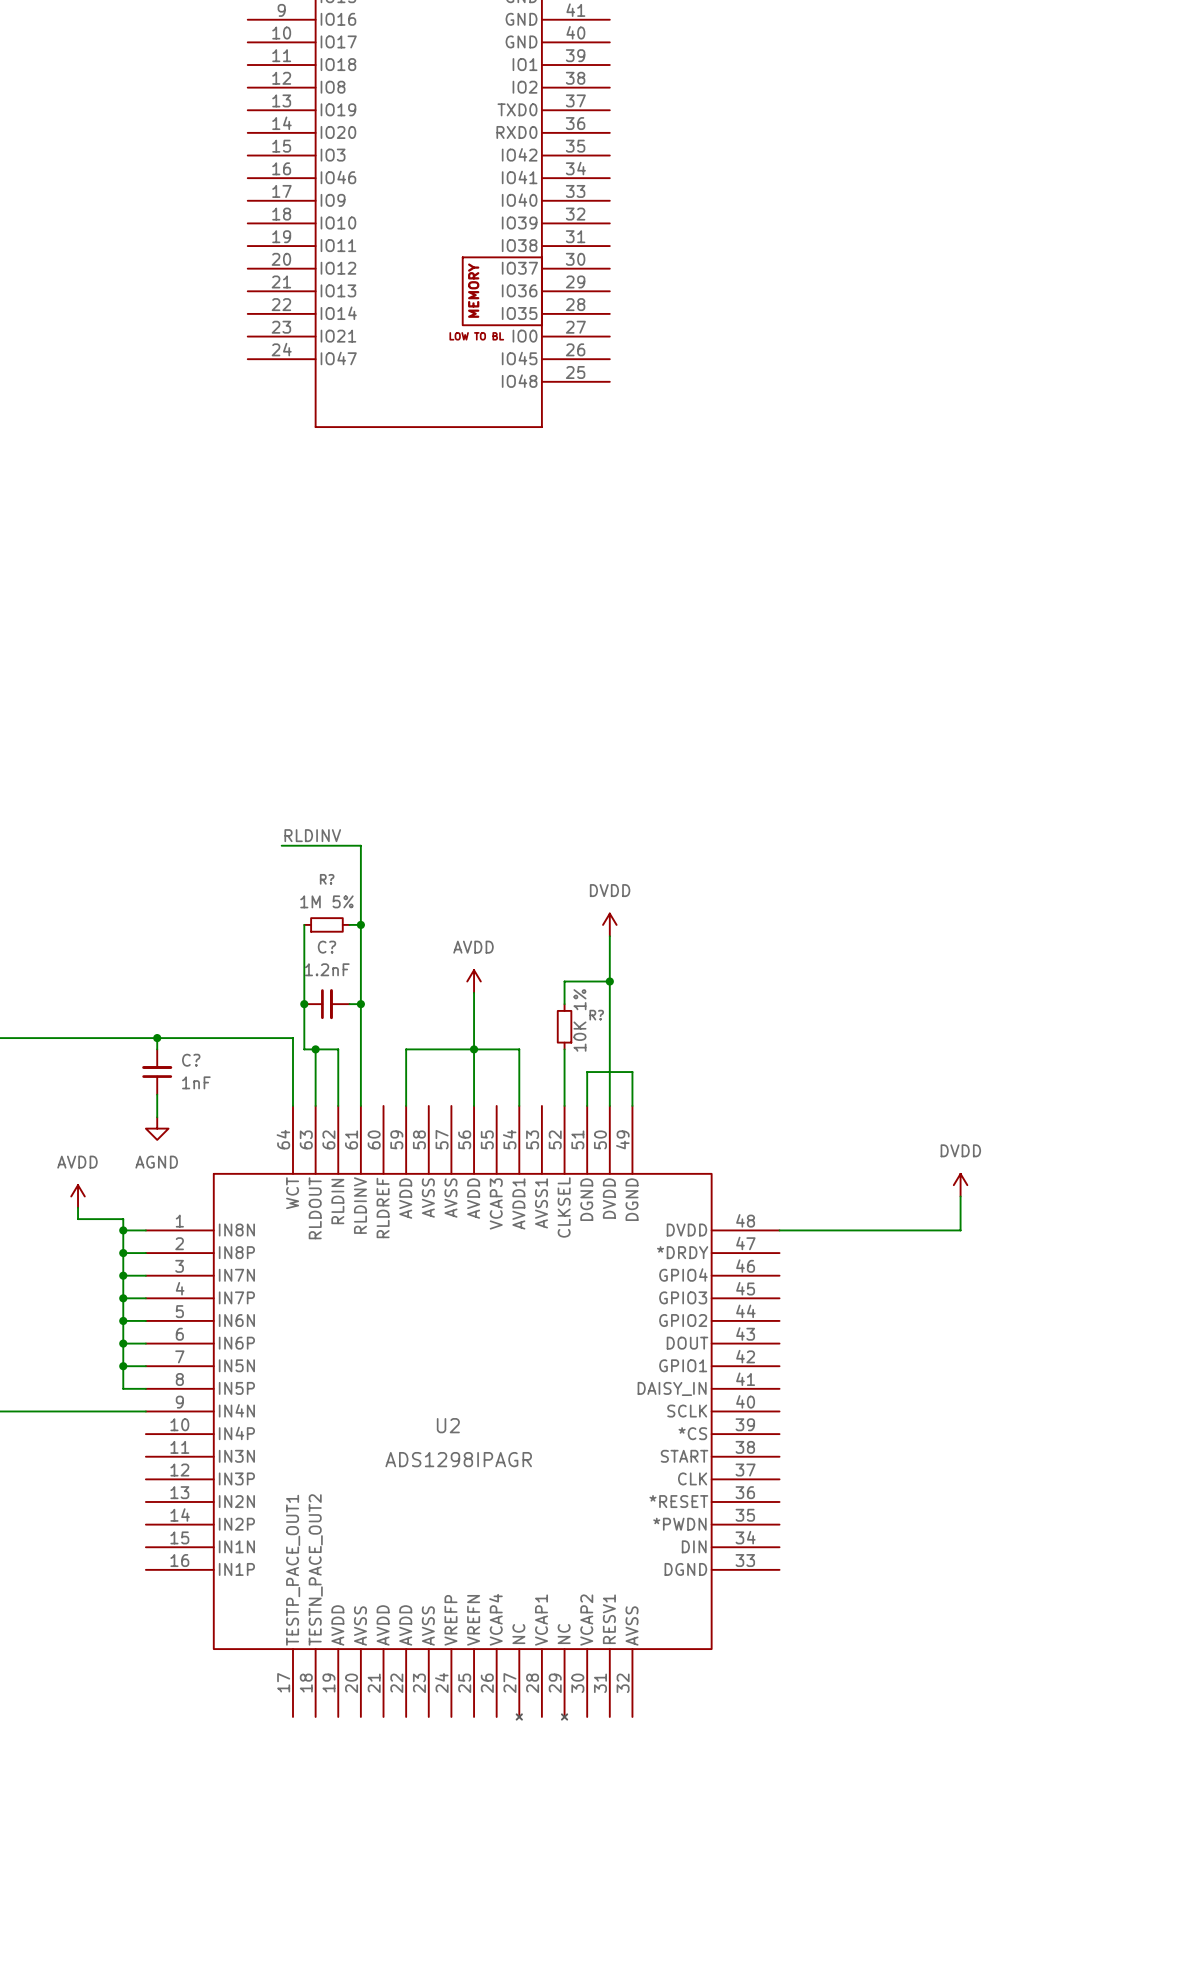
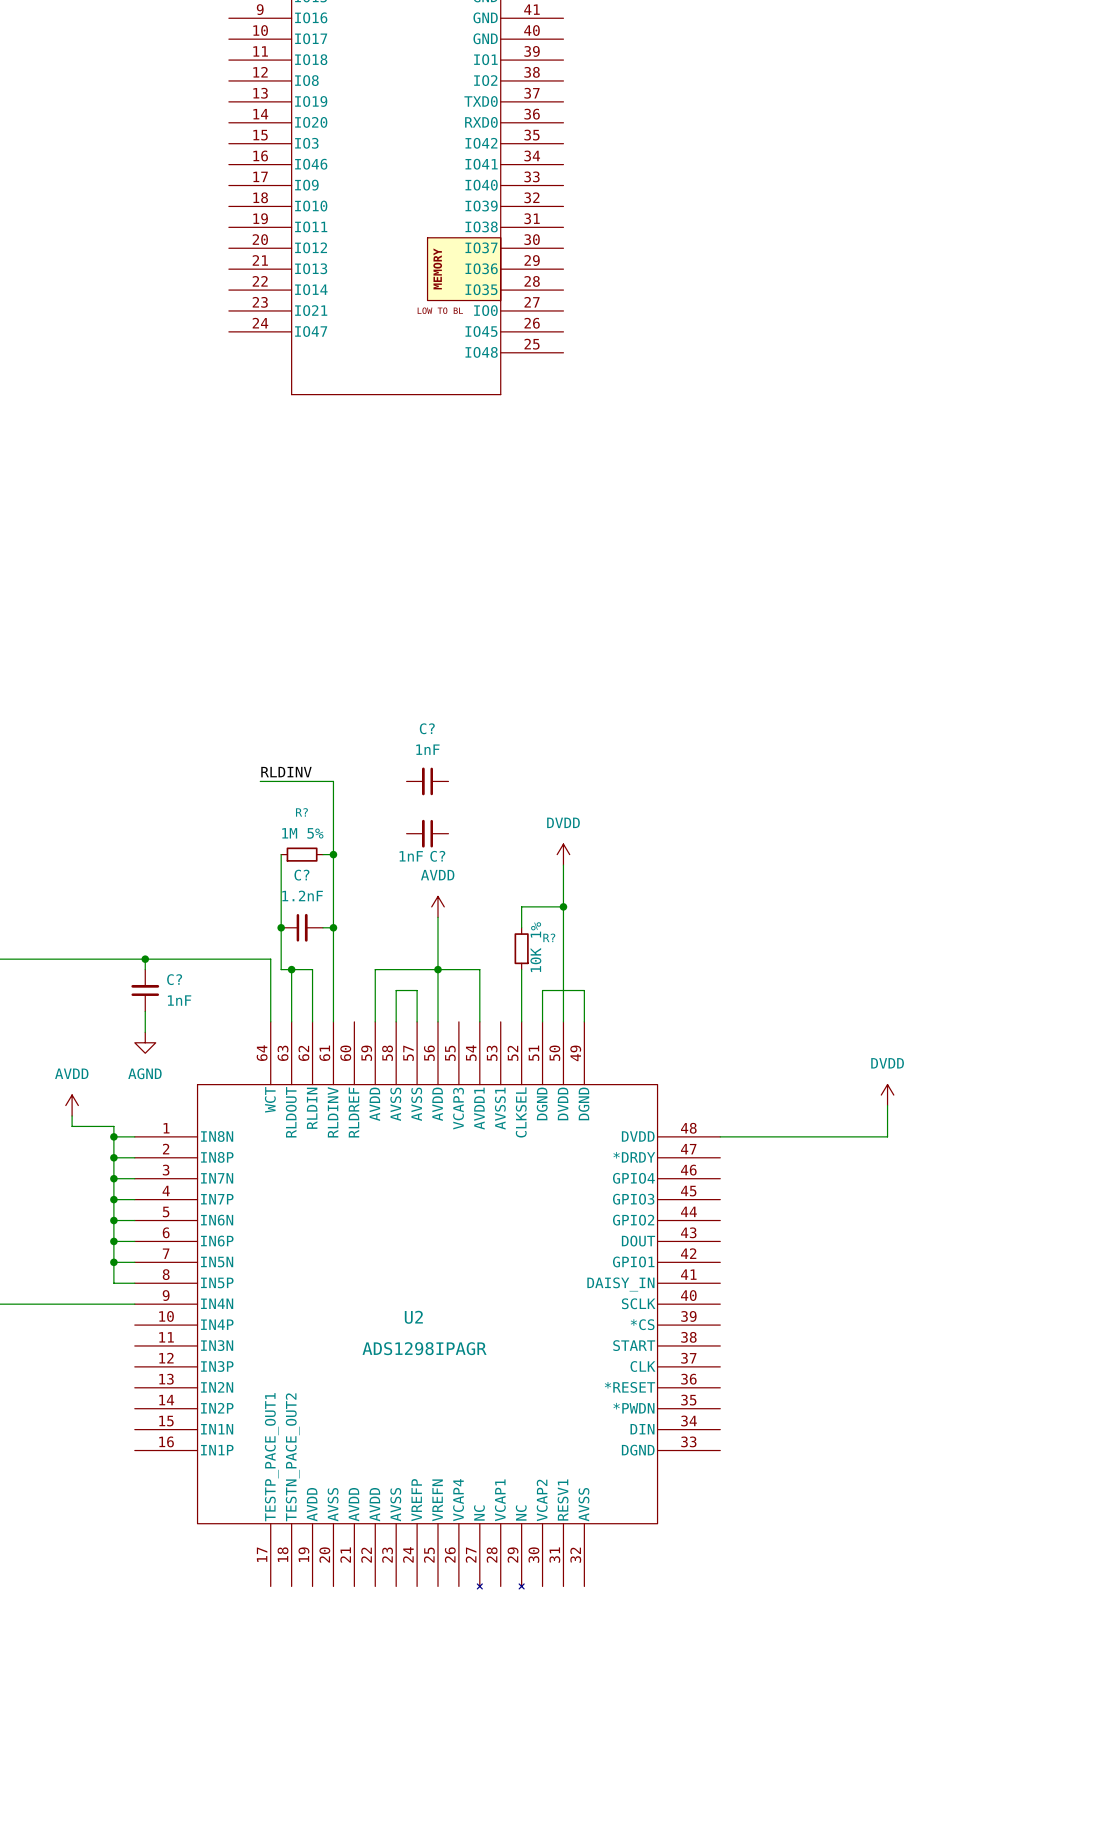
C?: none -> 1nF (427, 781)
C?: none -> 1nF (427, 833)
wire: none -> (396, 1021) (396, 990) (417, 990) (417, 1021)

